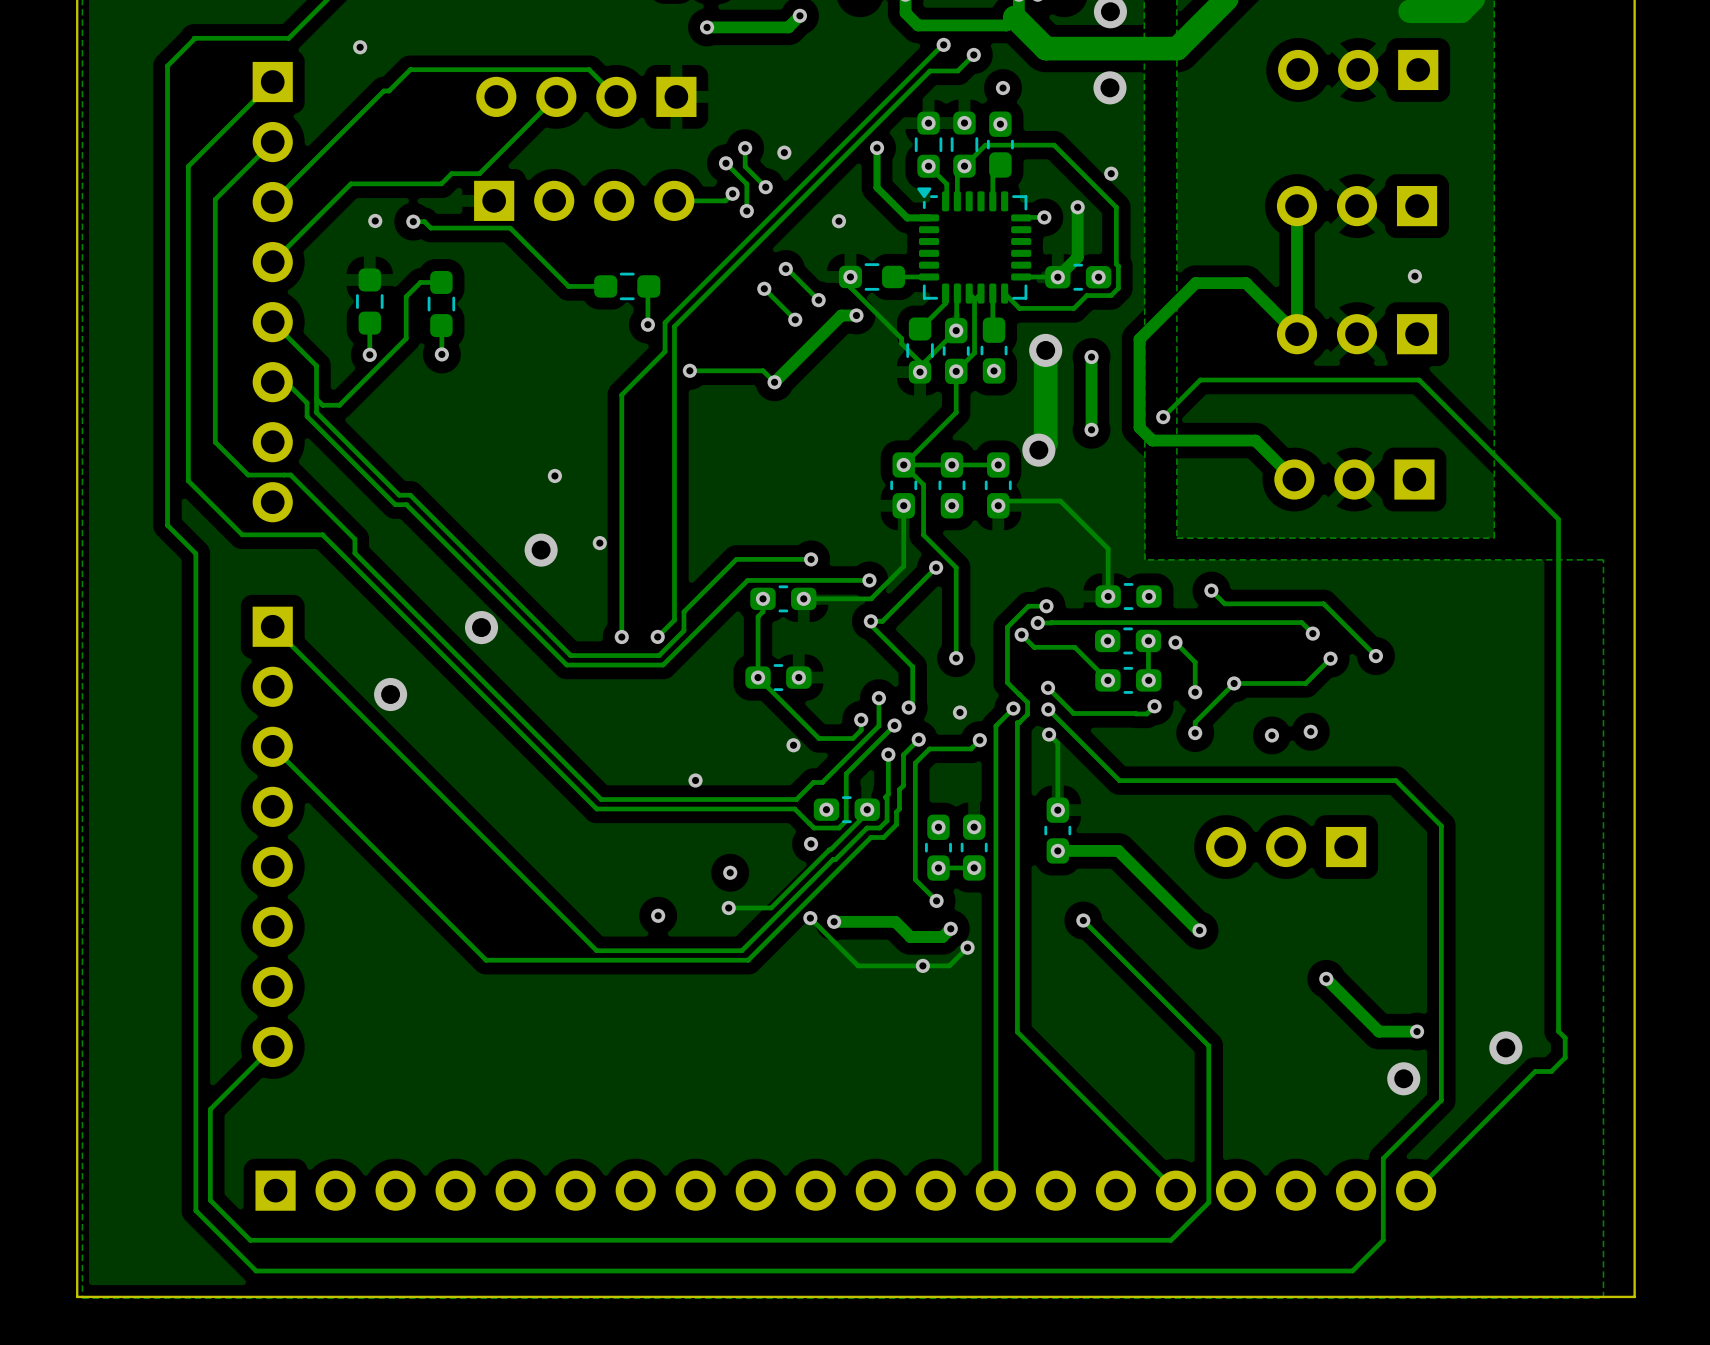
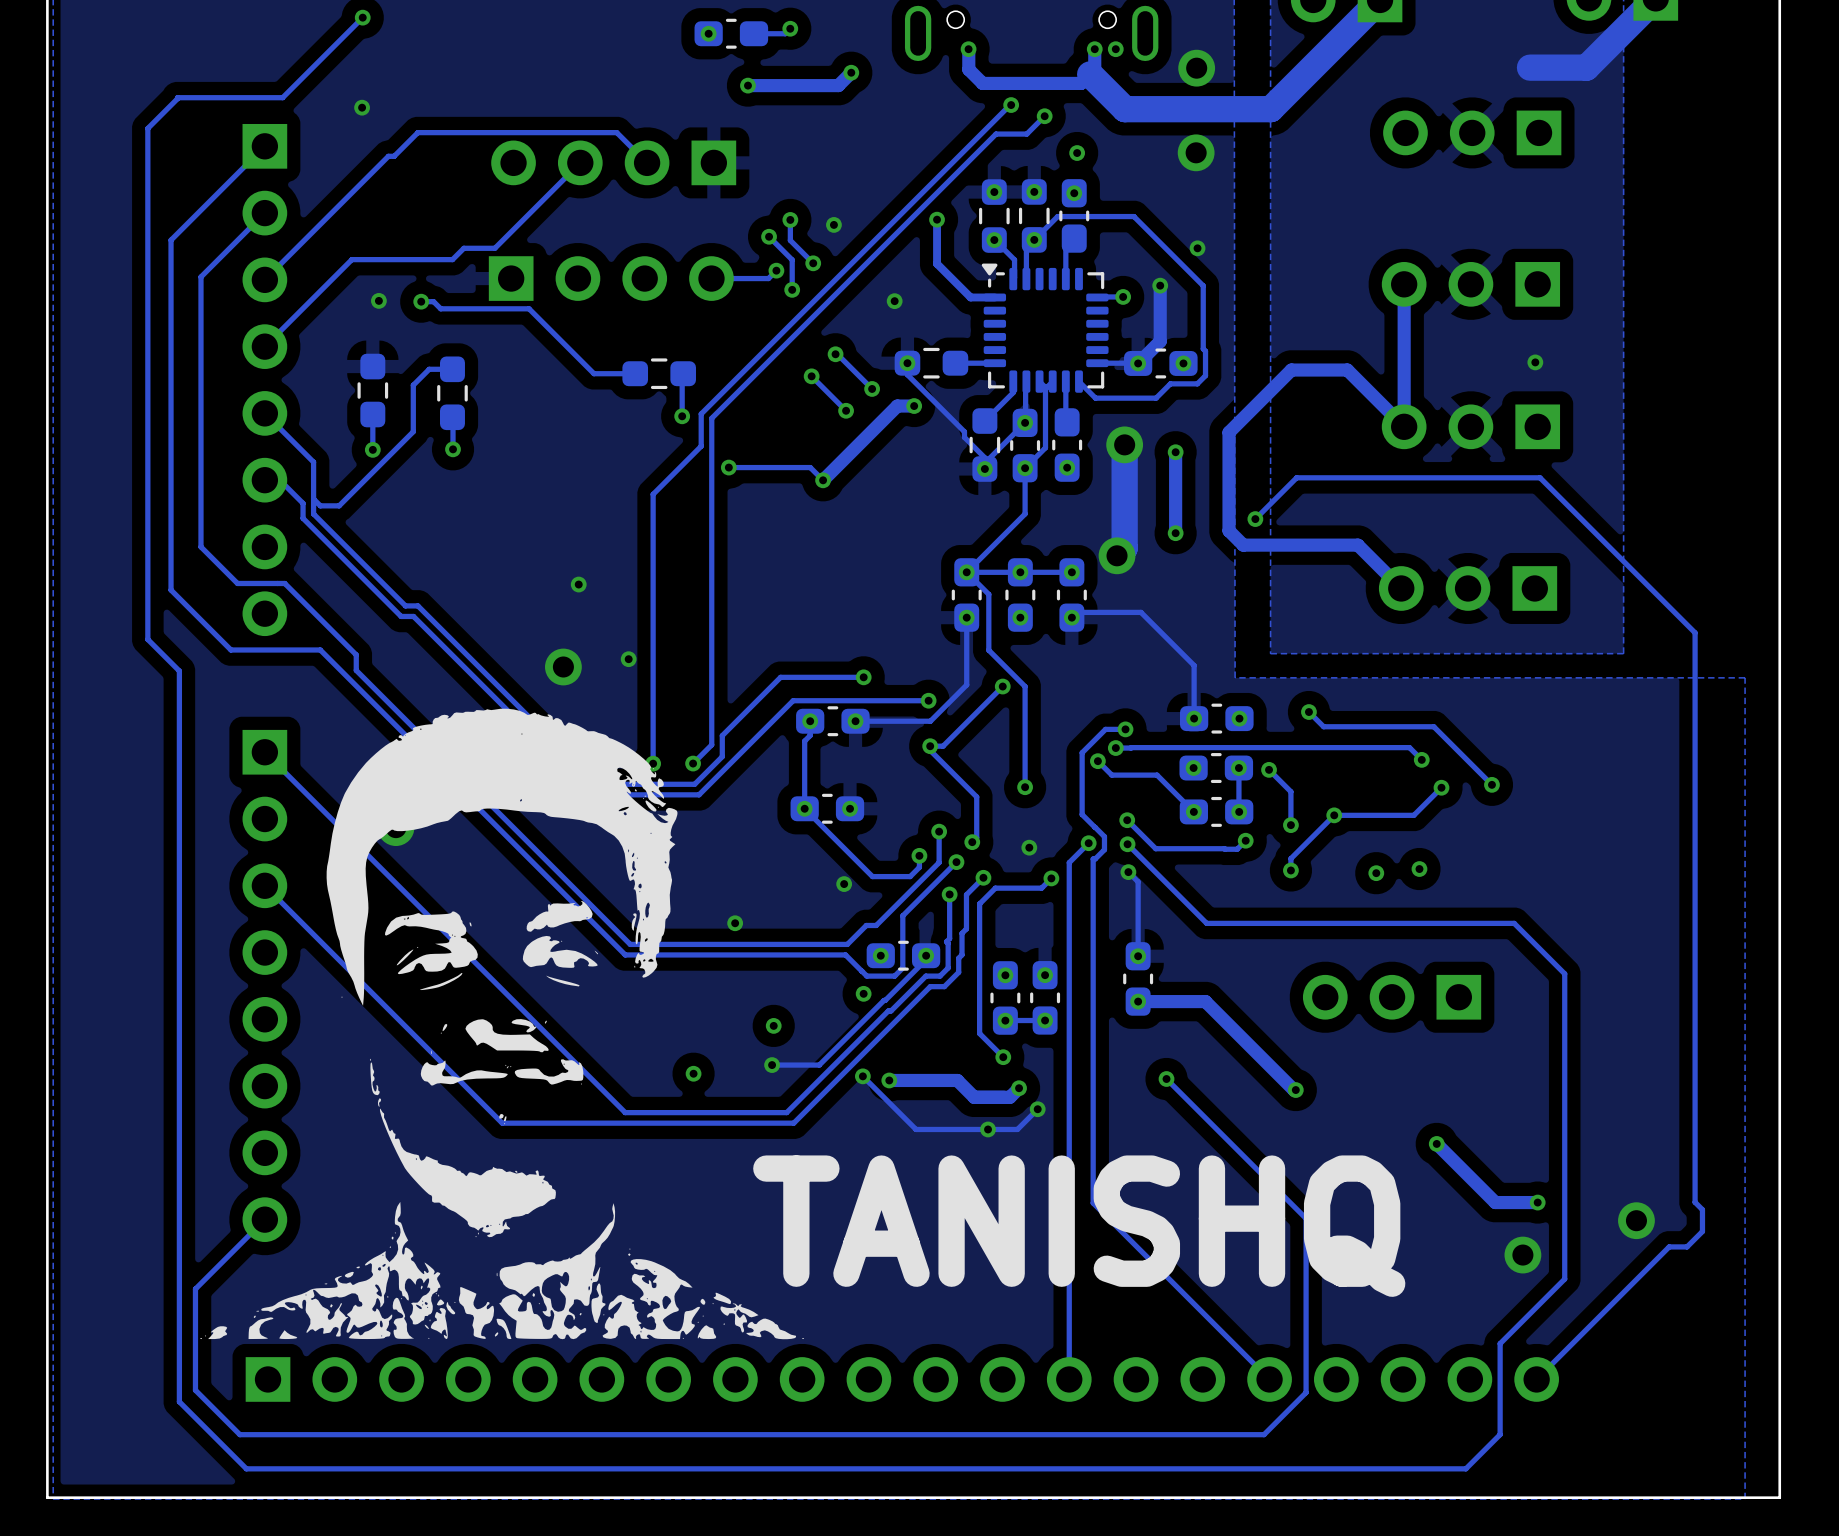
drawing: none -> [200, 708, 804, 1340]
text: none -> TANISHQ (1079, 1226)

